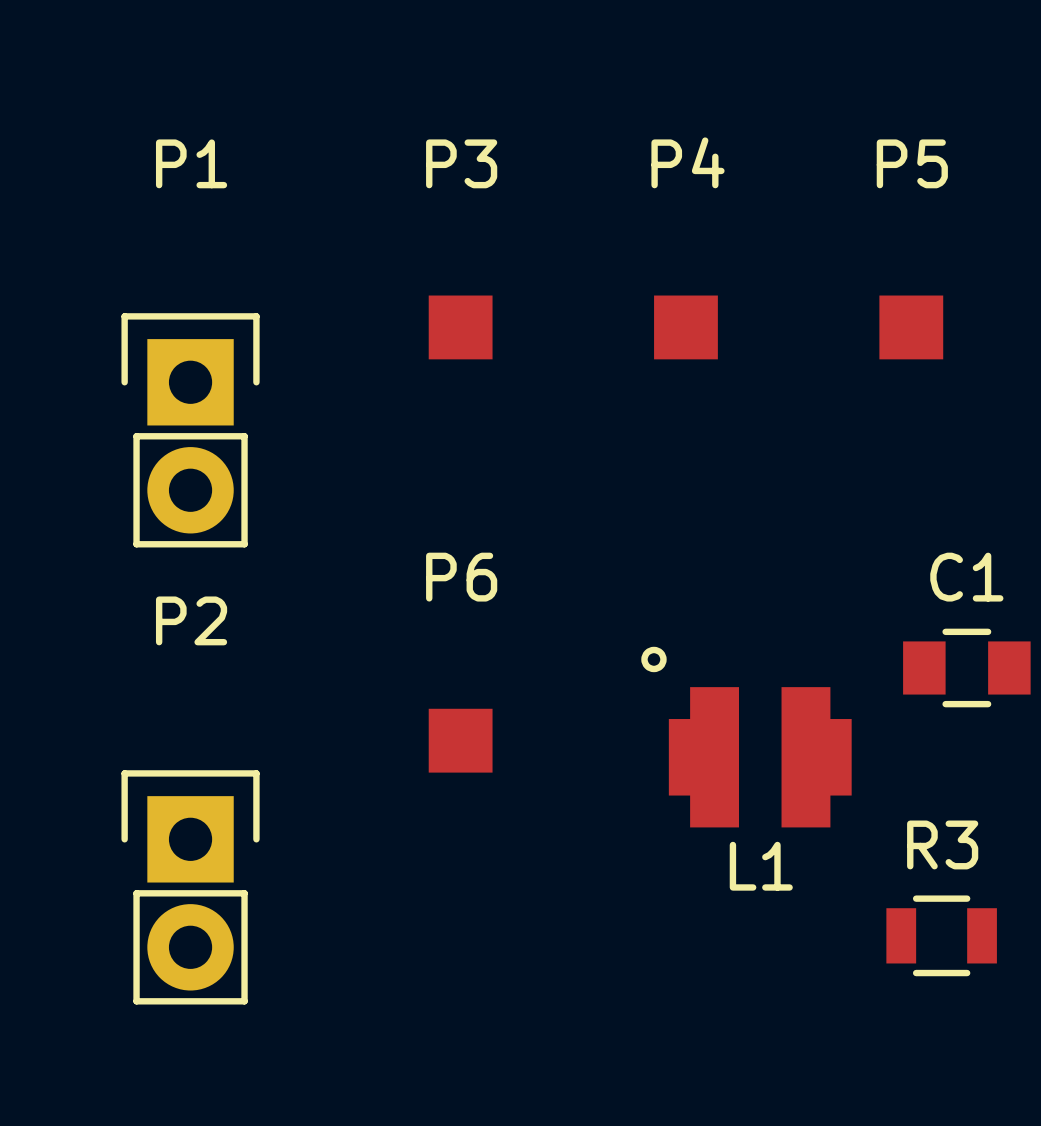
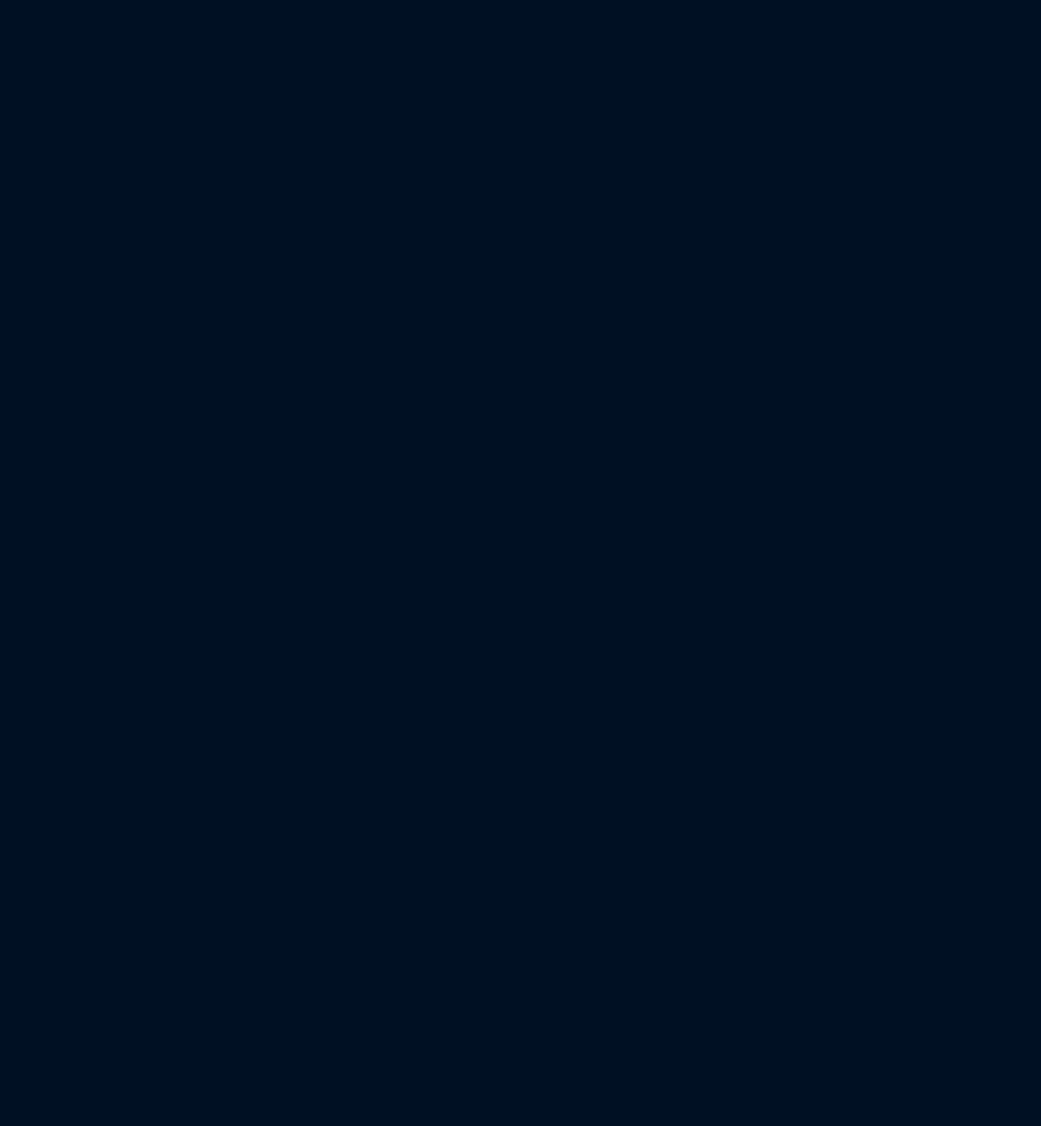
P3: (460, 327) -> none
P4: (685, 327) -> none
P5: (911, 327) -> none
P1: (190, 430) -> none
C1: (966, 667) -> none
L1: (746, 737) -> none
P6: (460, 740) -> none
P2: (190, 887) -> none
R3: (941, 935) -> none

